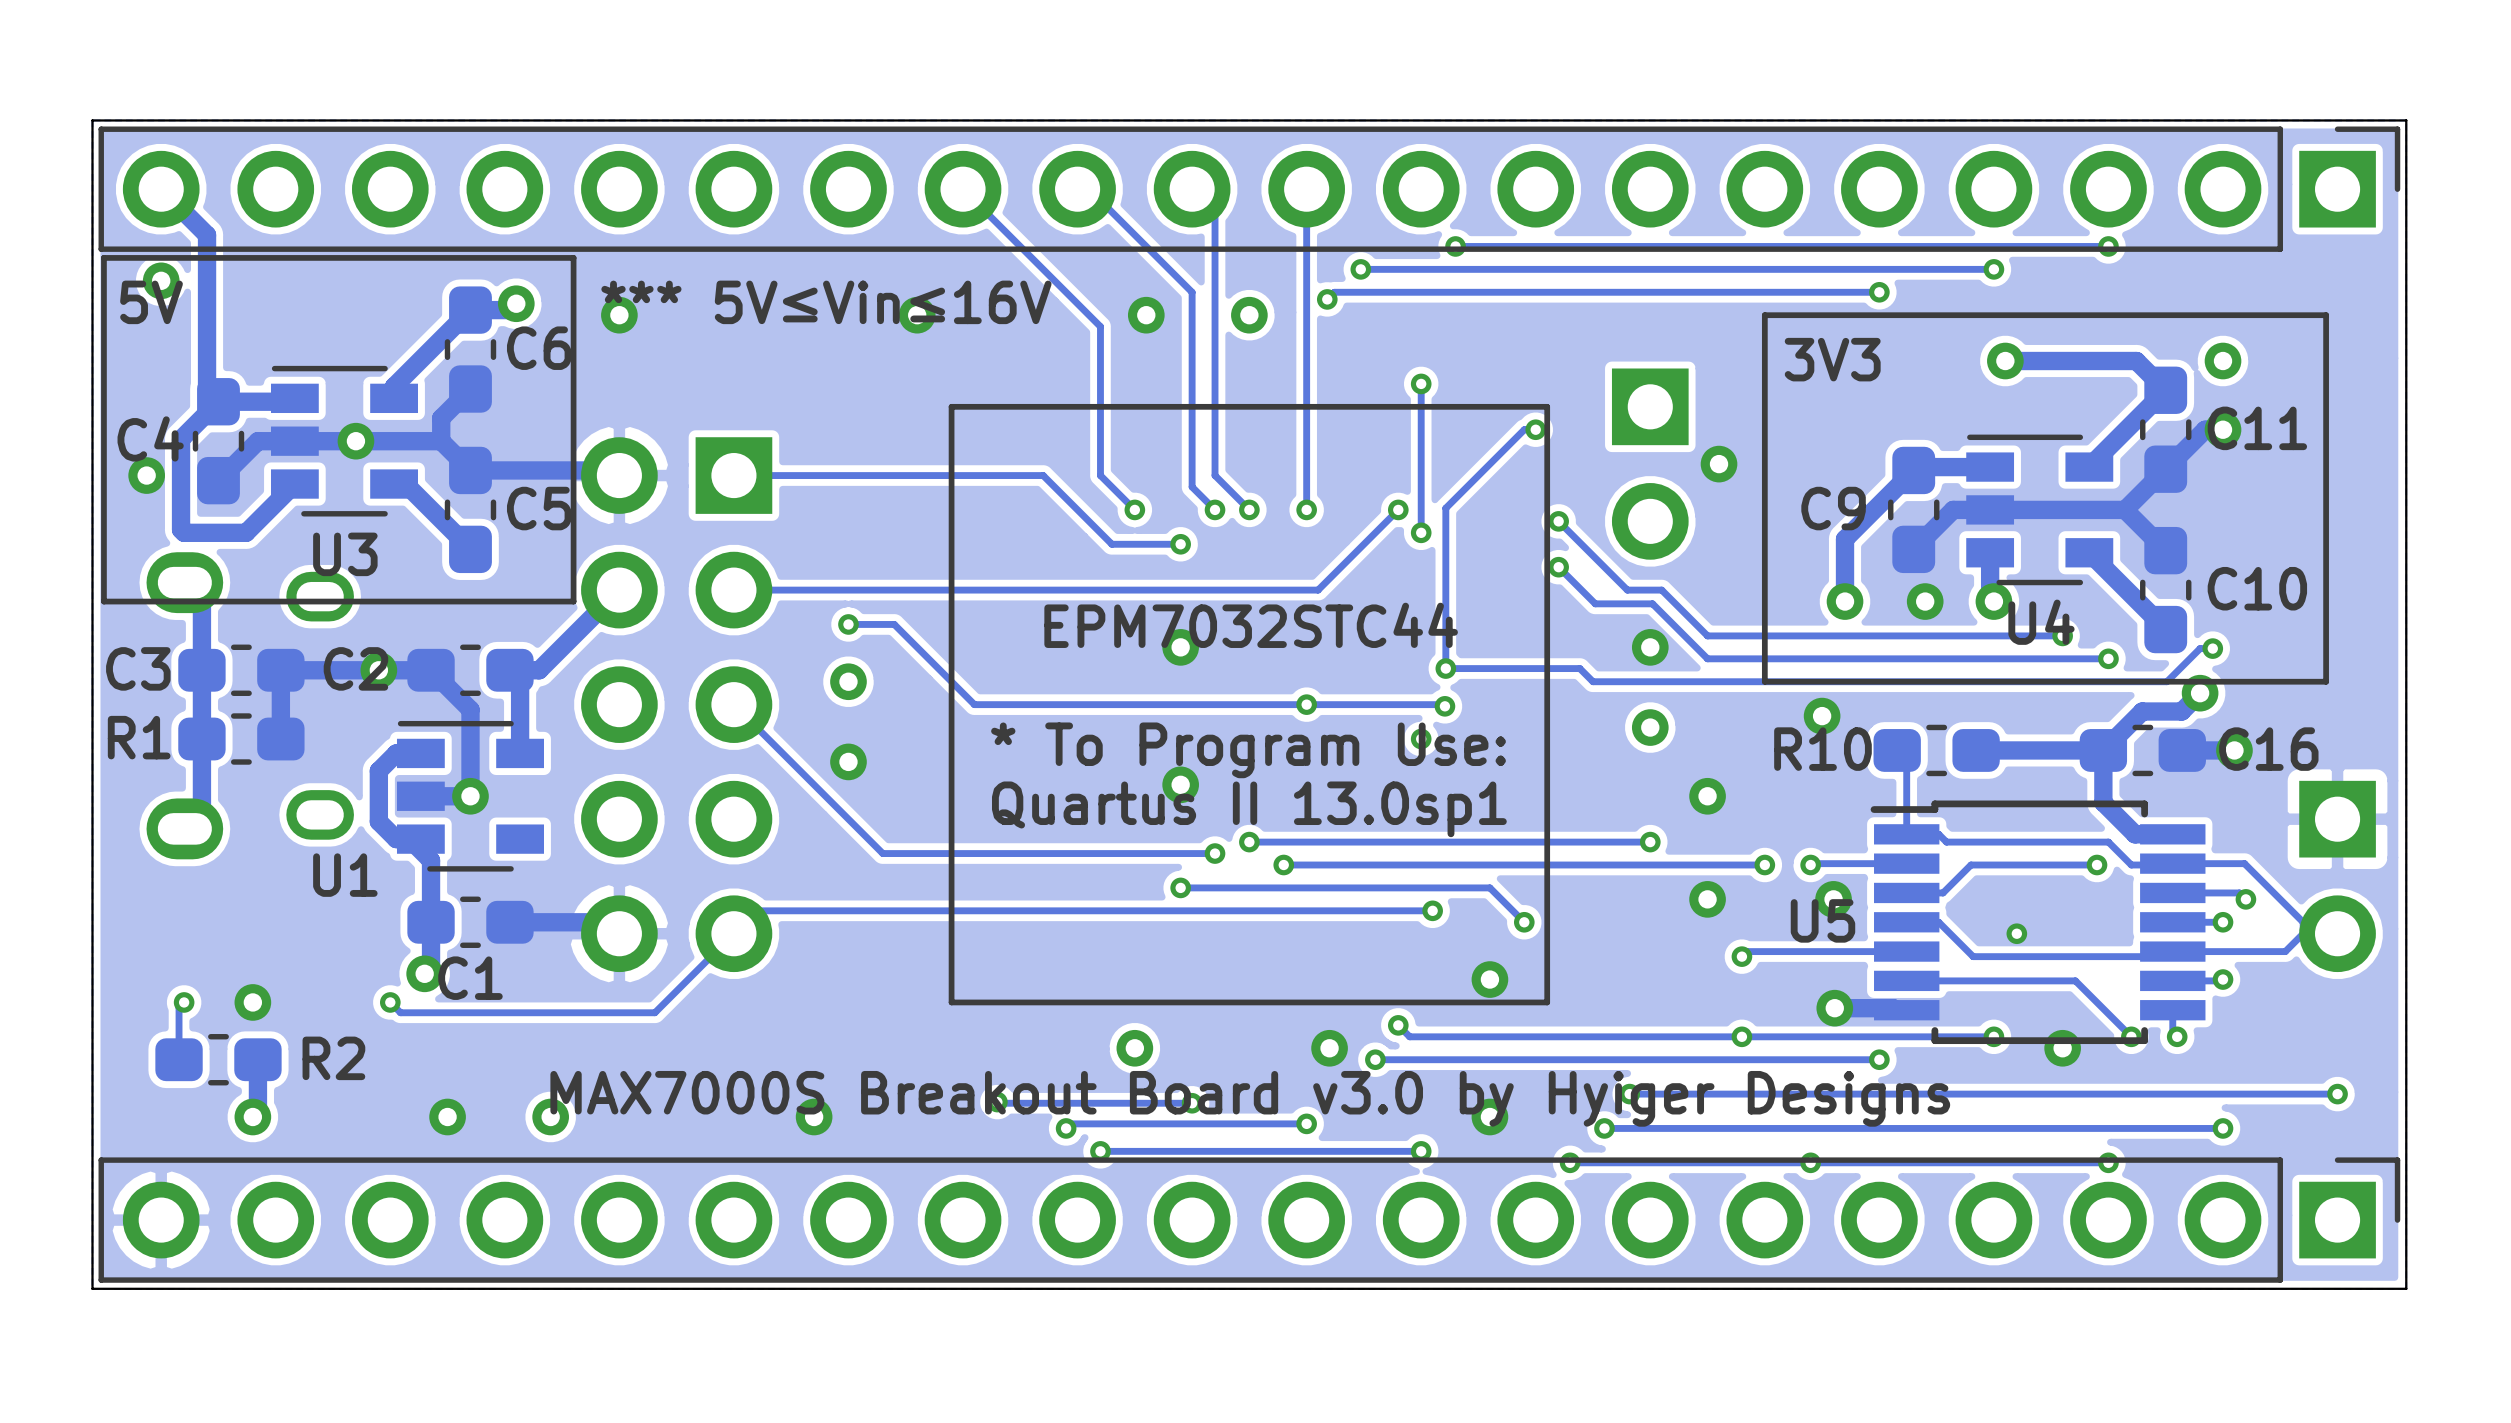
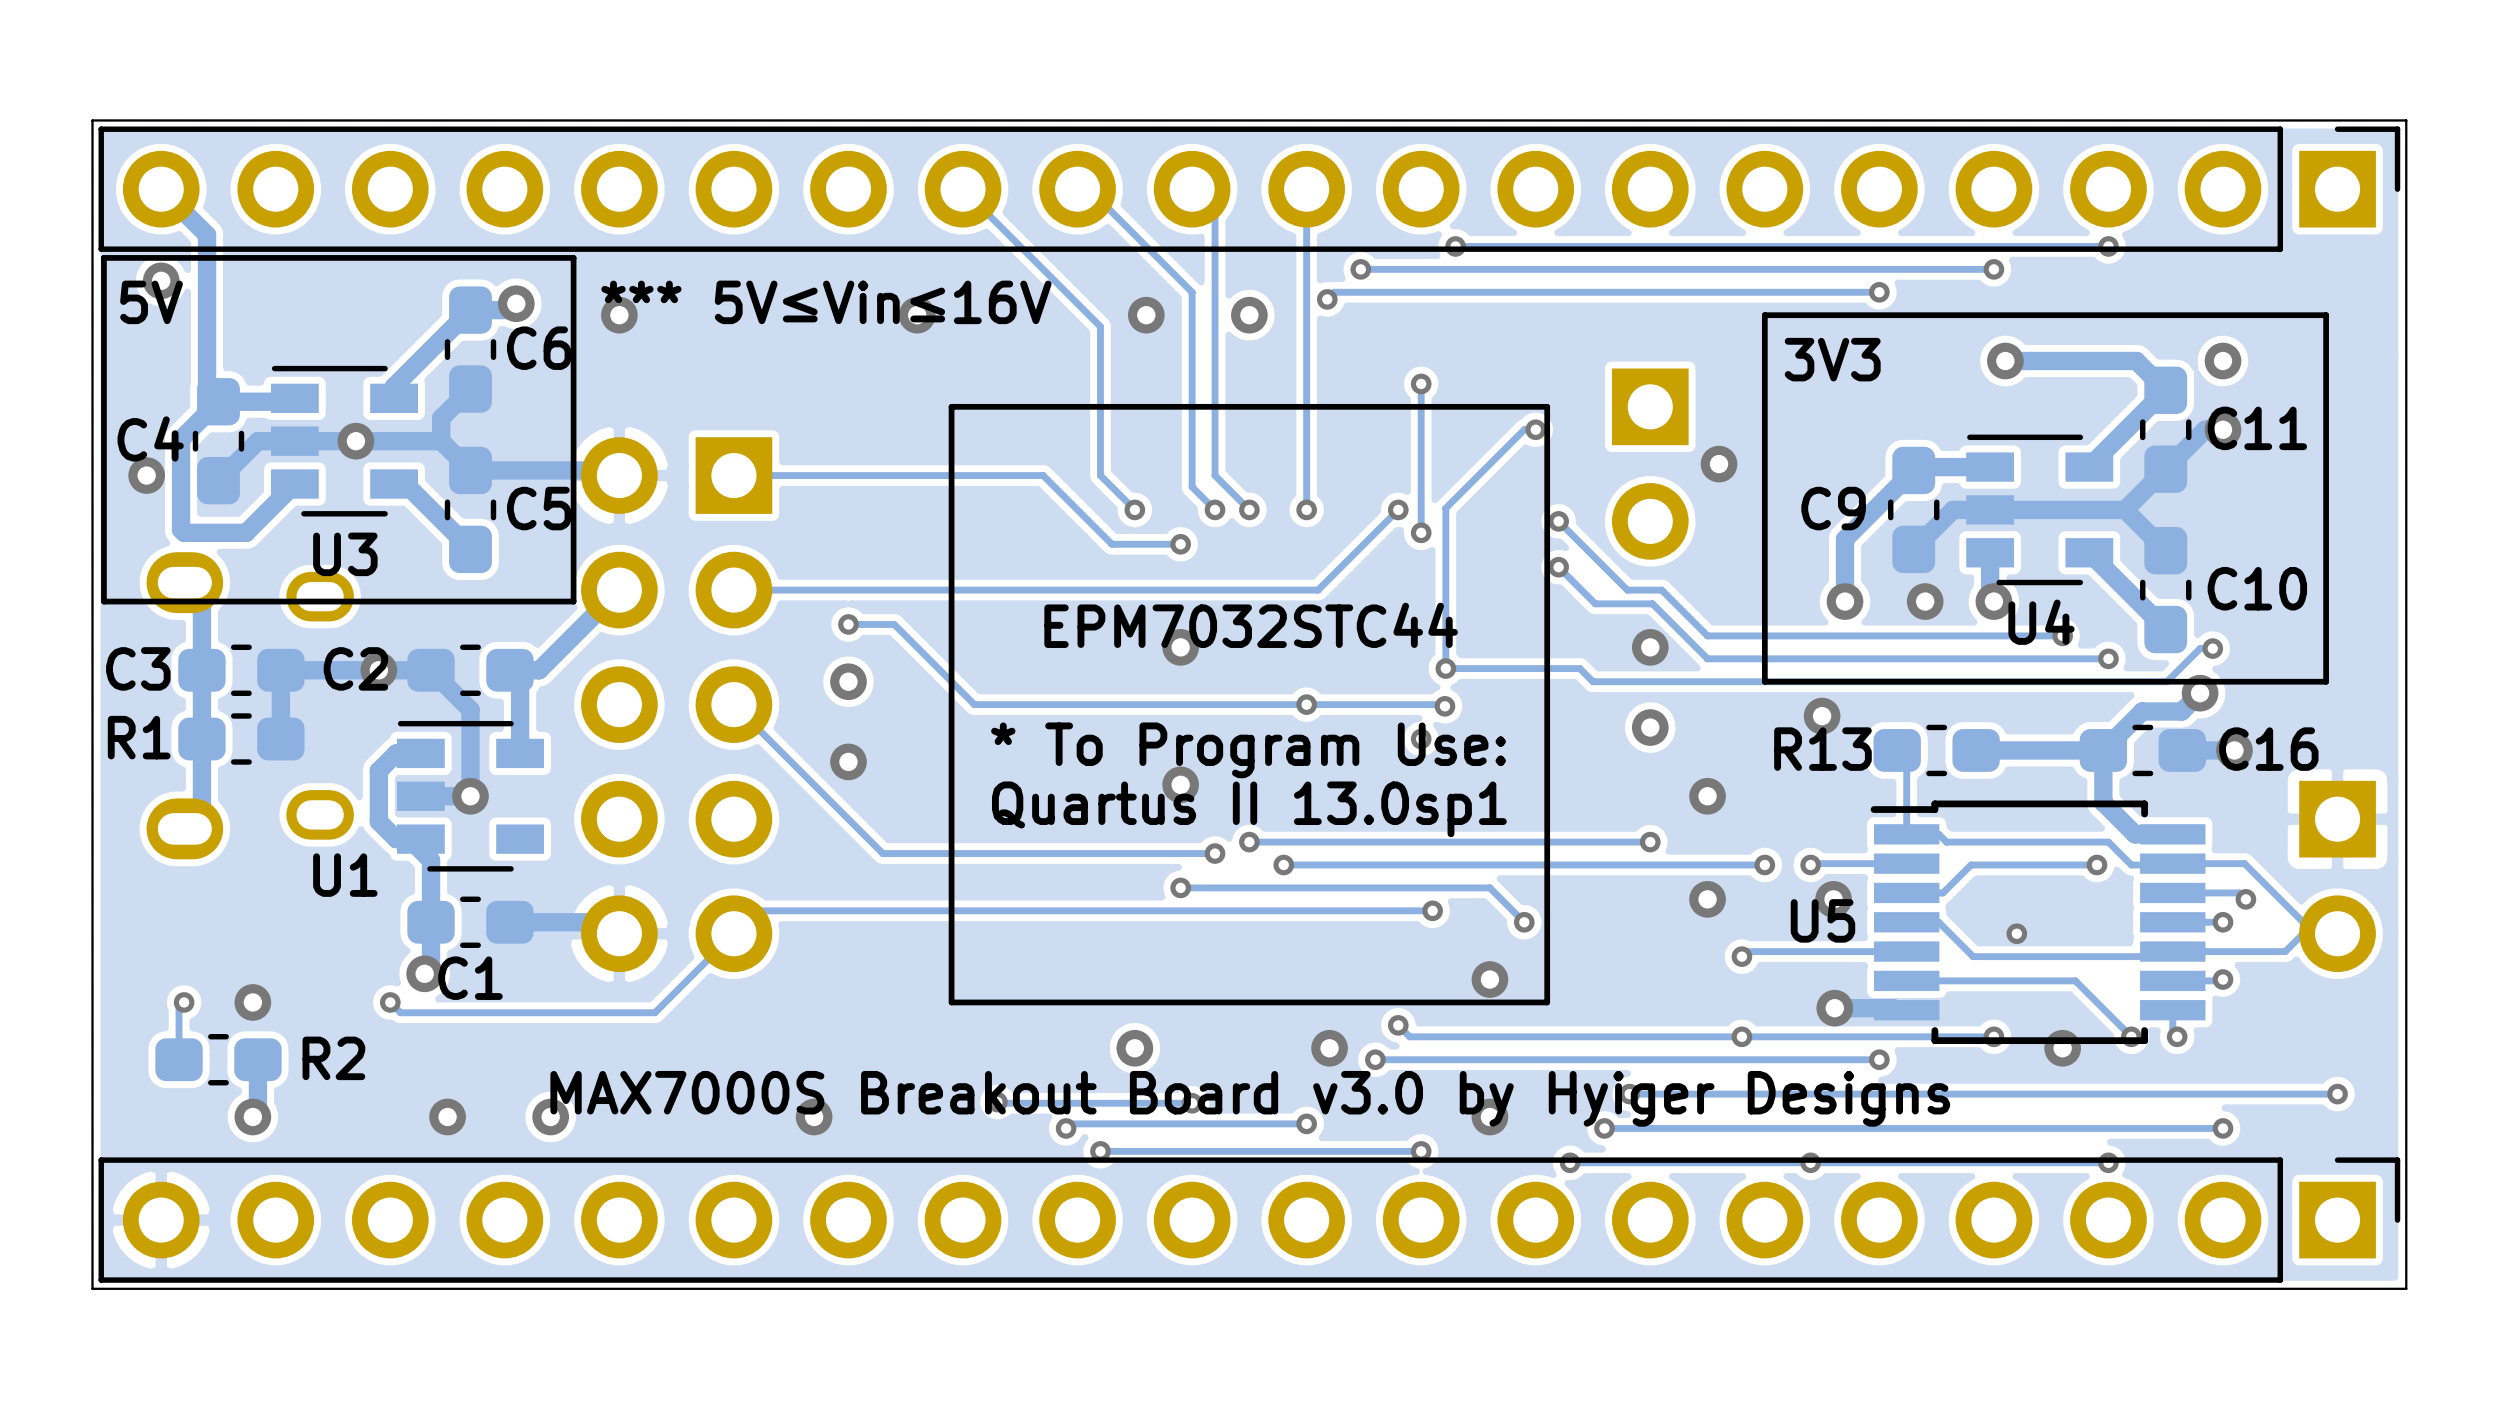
R10 name: R10 (1822, 749) -> R13 (1822, 749)

